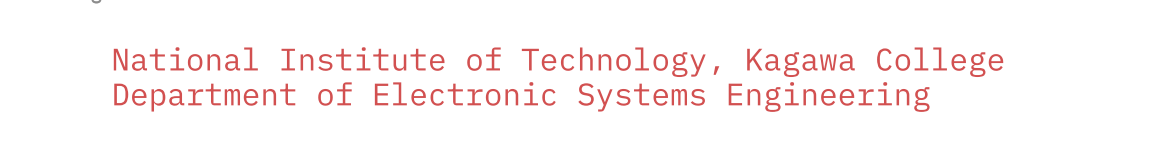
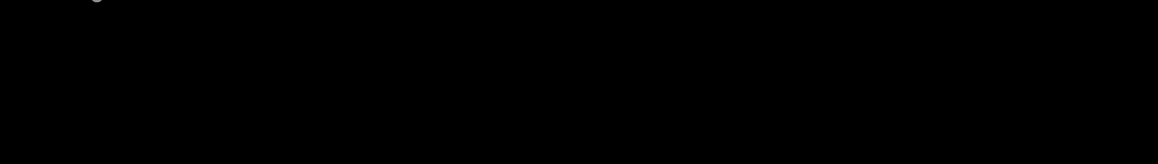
text: National Institute of Technology, Kagawa College (558, 62) -> none
text: Department of Electronic Systems Engineering (521, 97) -> none

